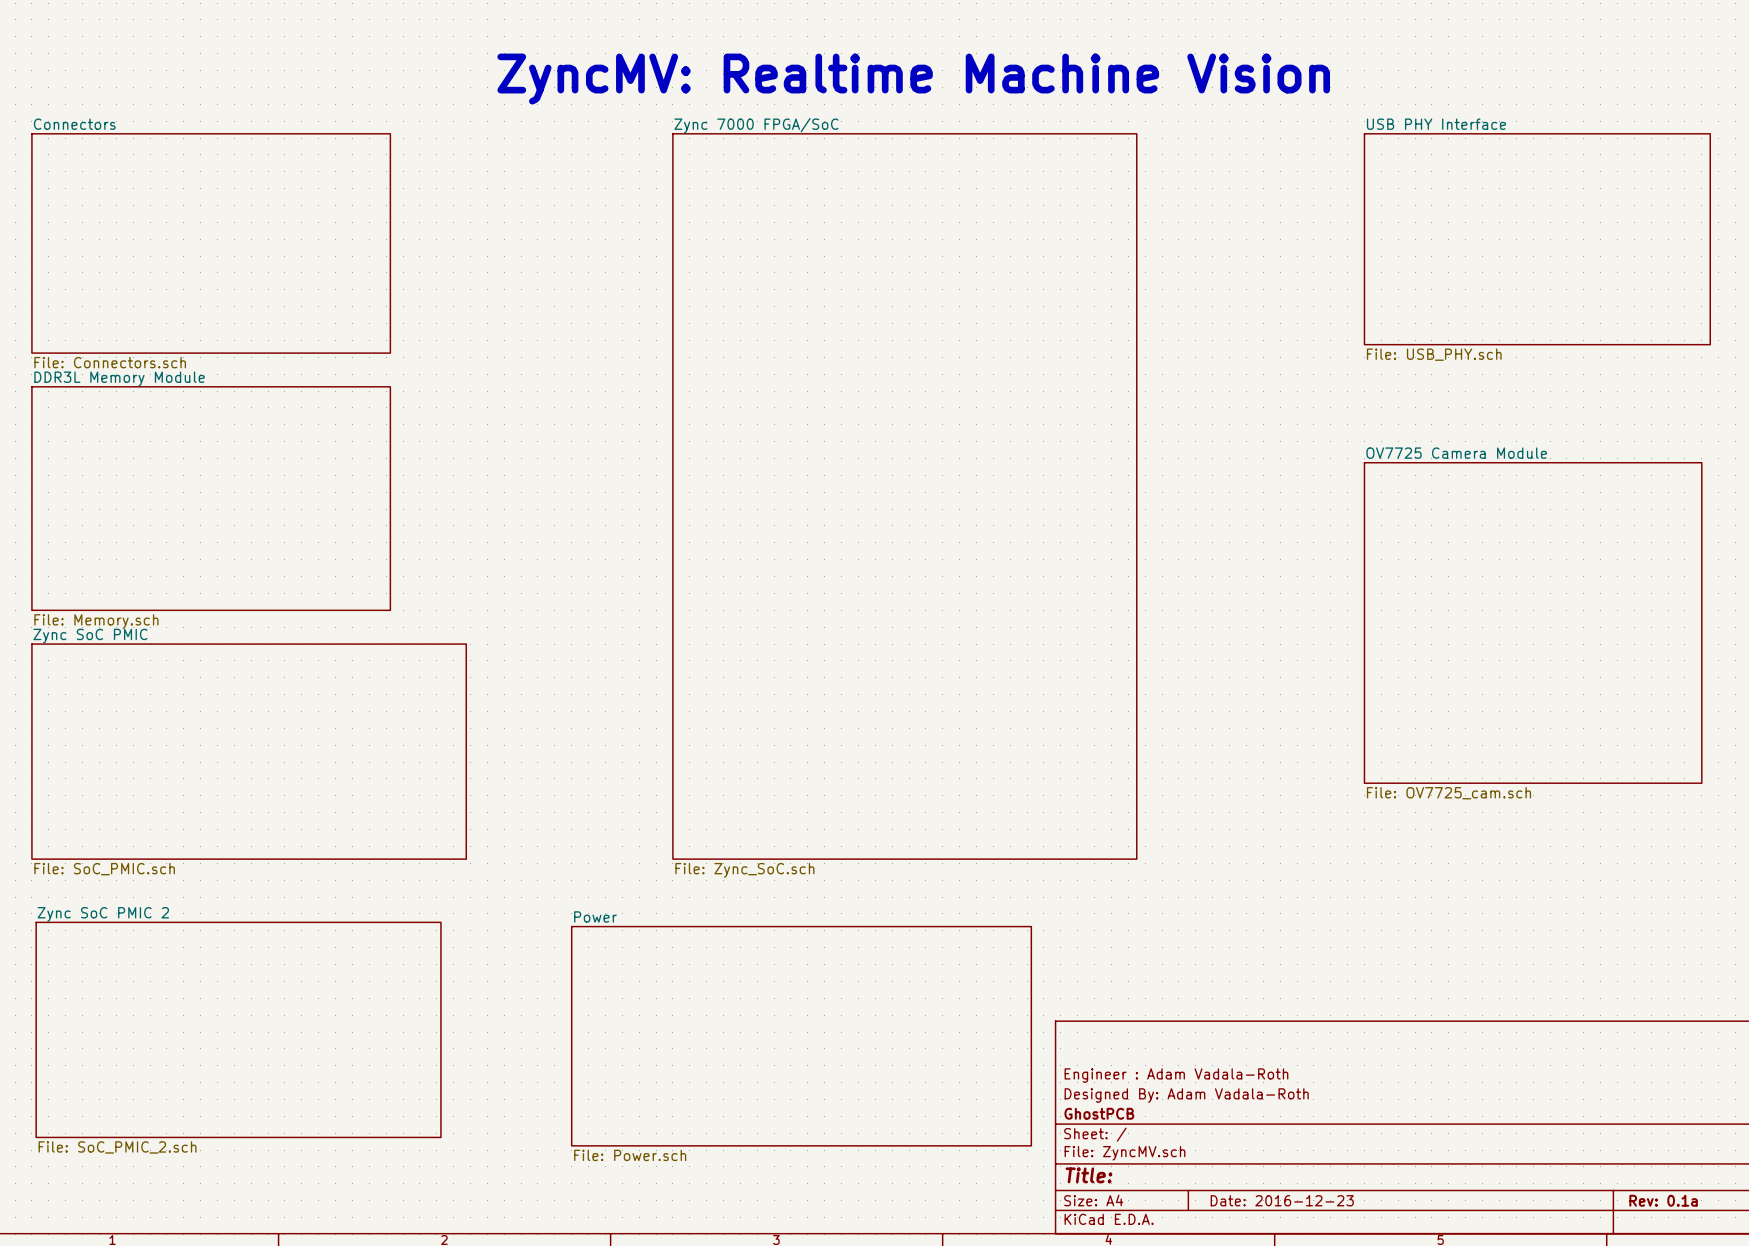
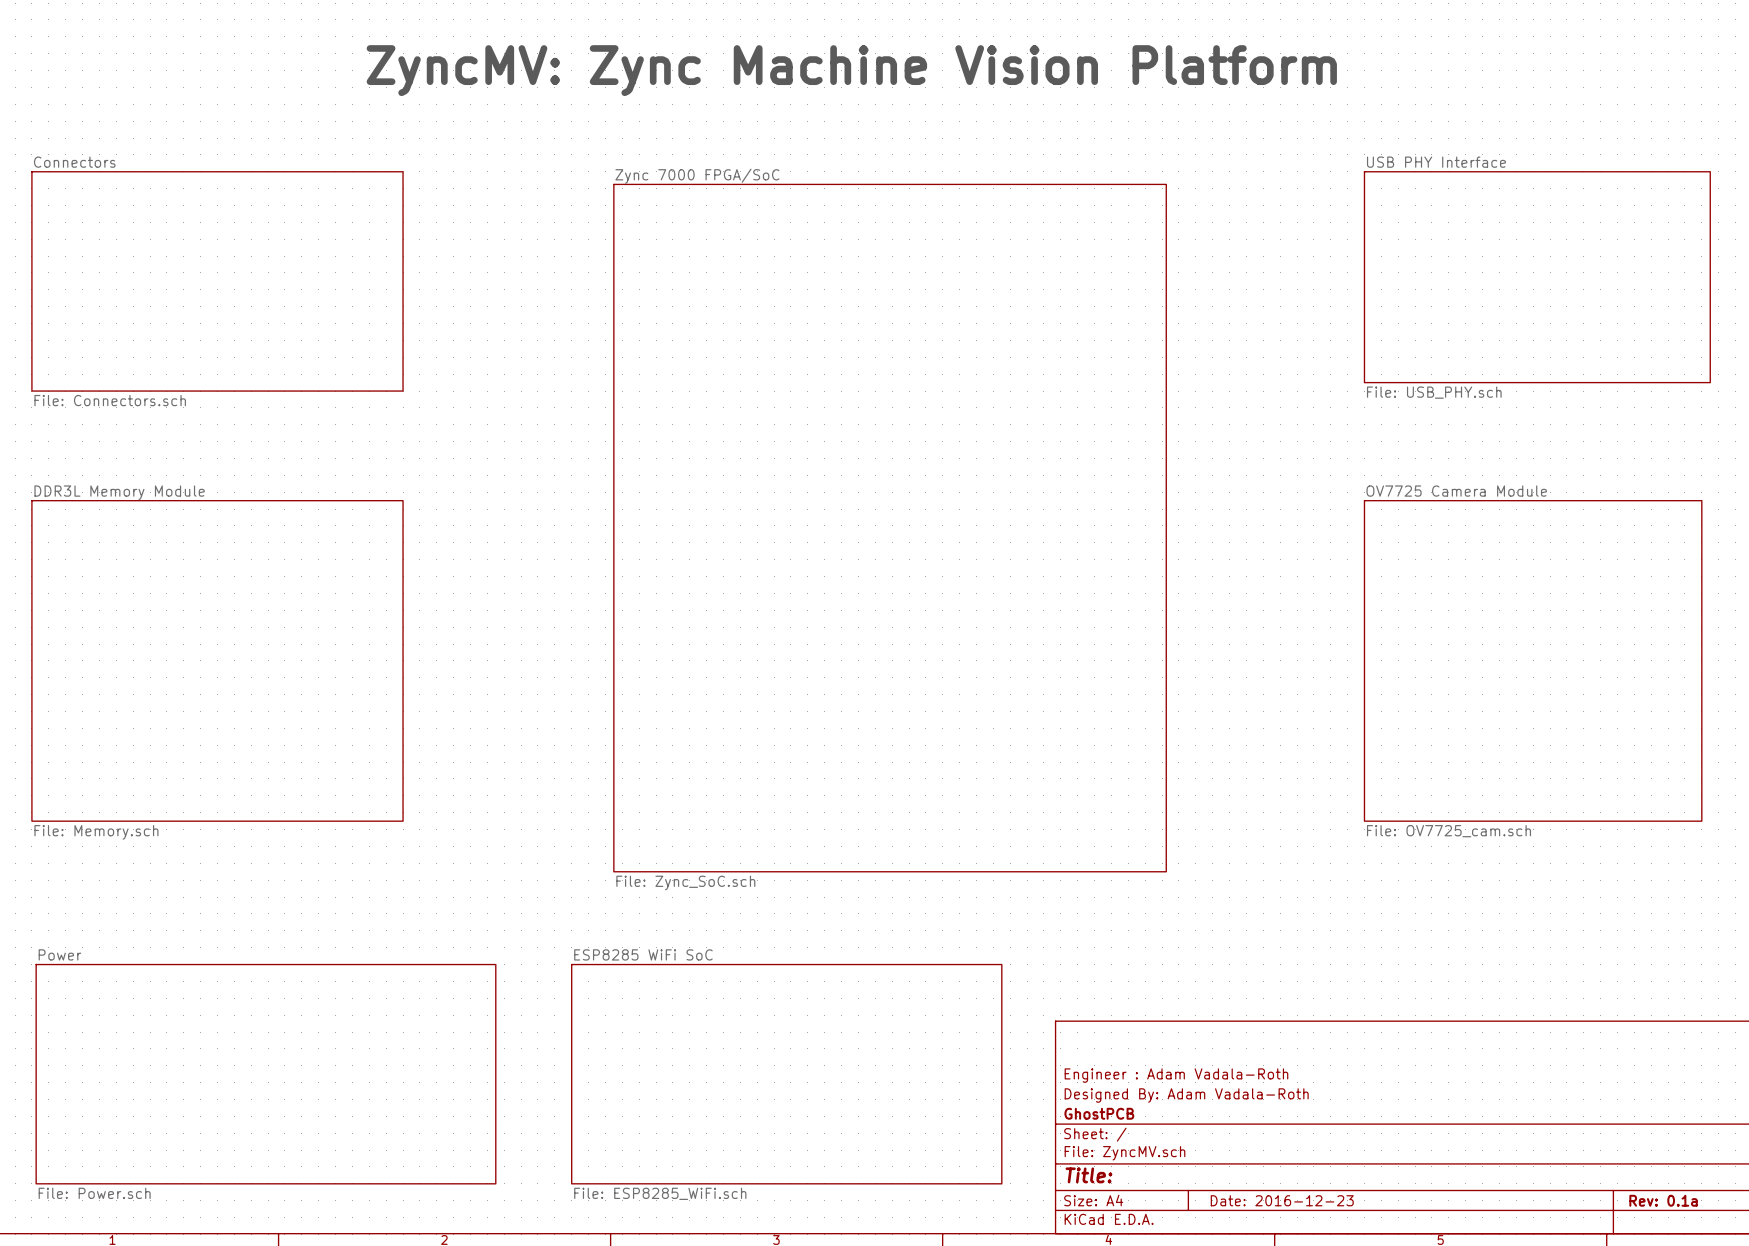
text: ZyncMV: Realtime Machine Vision (913, 79) -> ZyncMV: Zync Machine Vision Platform (851, 70)
sheet Zync 7000 FPGA/SoC name position: Zync 7000 FPGA/SoC (756, 125) -> Zync 7000 FPGA/SoC (697, 176)
sheet Zync 7000 FPGA/SoC shape: [672, 133, 1137, 860] -> [613, 184, 1167, 872]
sheet USB PHY Interface position: (1537, 239) -> (1537, 277)
sheet Connectors: File: Connectors.sch (211, 243) -> none
sheet Connectors: none -> File: Connectors.sch (217, 281)
sheet DDR3L Memory Module name position: DDR3L Memory Module (119, 378) -> DDR3L Memory Module (119, 492)
sheet DDR3L Memory Module shape: [31, 386, 391, 611] -> [31, 500, 404, 822]
sheet DDR3L Memory Module value position: File: Memory.sch (96, 621) -> File: Memory.sch (96, 832)
sheet OV7725 Camera Module position: (1533, 622) -> (1533, 660)
sheet Zync SoC PMIC: File: SoC_PMIC.sch (249, 751) -> none
sheet Zync 7000 FPGA/SoC value position: File: Zync_SoC.sch (744, 870) -> File: Zync_SoC.sch (685, 882)
sheet Zync SoC PMIC 2: File: SoC_PMIC_2.sch (238, 1029) -> none
sheet Power: File: Power.sch (801, 1036) -> none
sheet Power: none -> File: Power.sch (265, 1074)
sheet ESP8285 WiFi SoC: none -> File: ESP8285_WiFi.sch (786, 1074)

